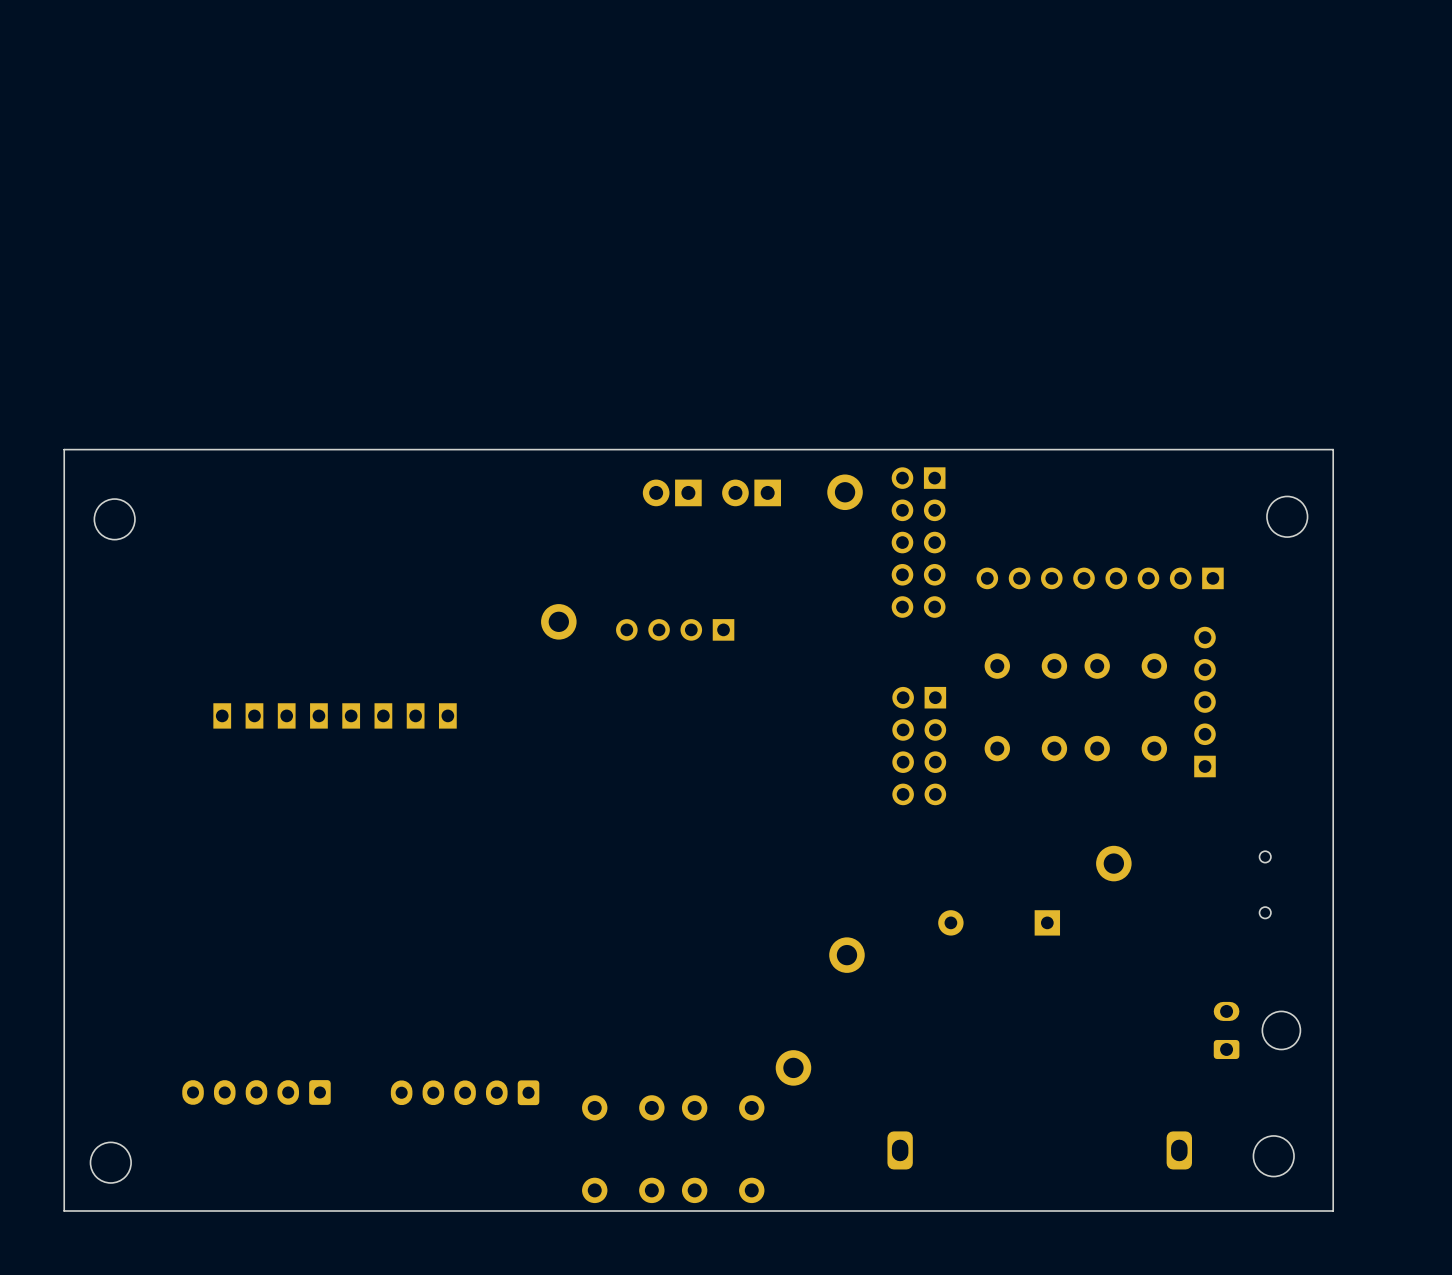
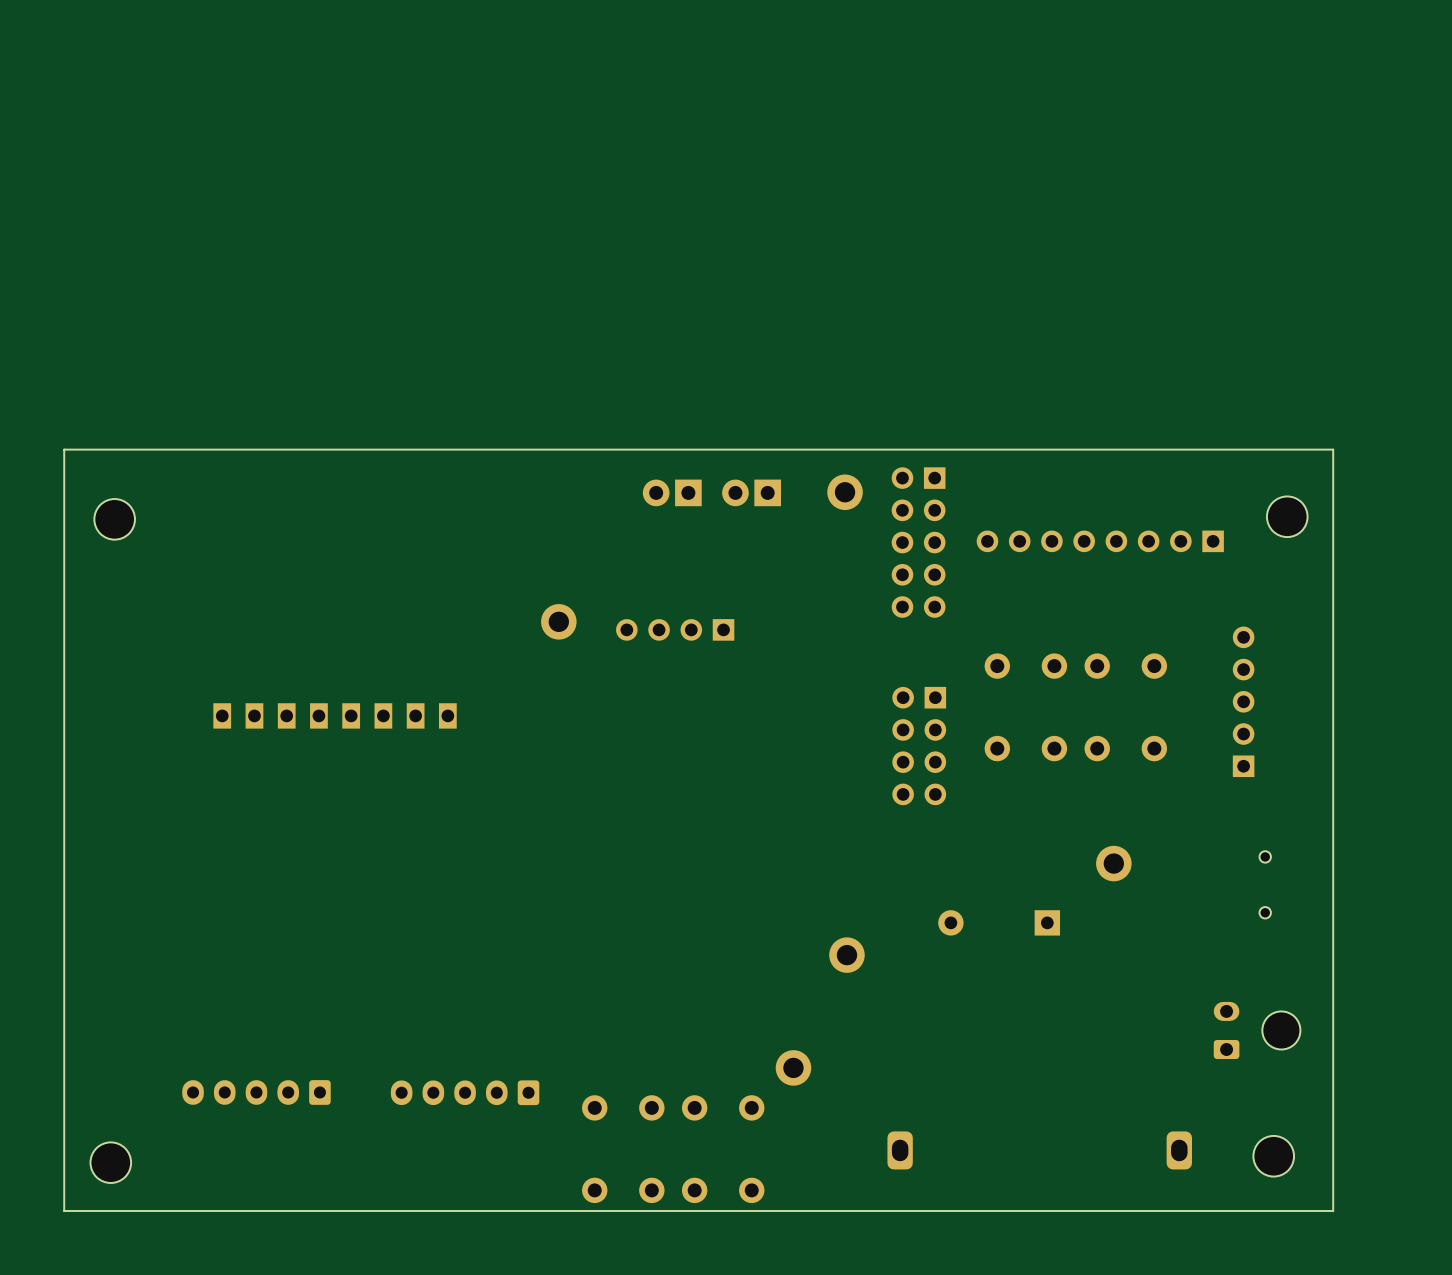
part position: (1100, 578) -> (1100, 541)
part position: (1204, 702) -> (1243, 701)

